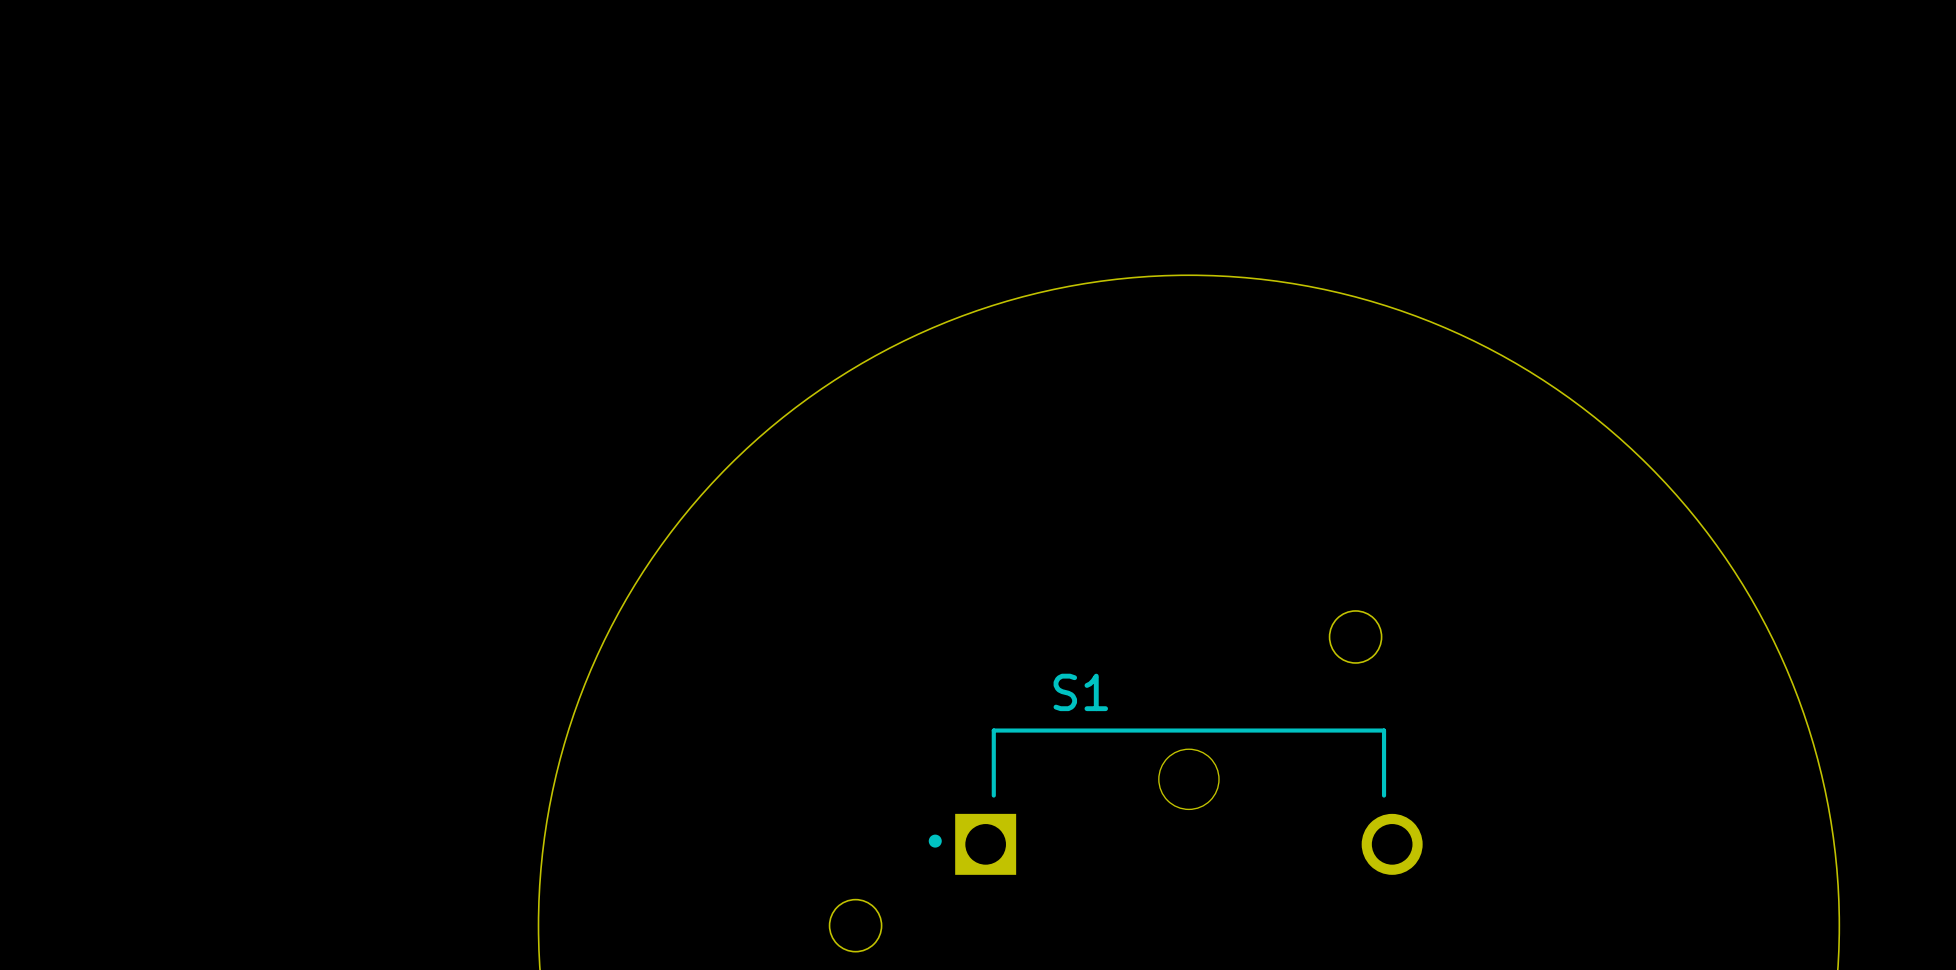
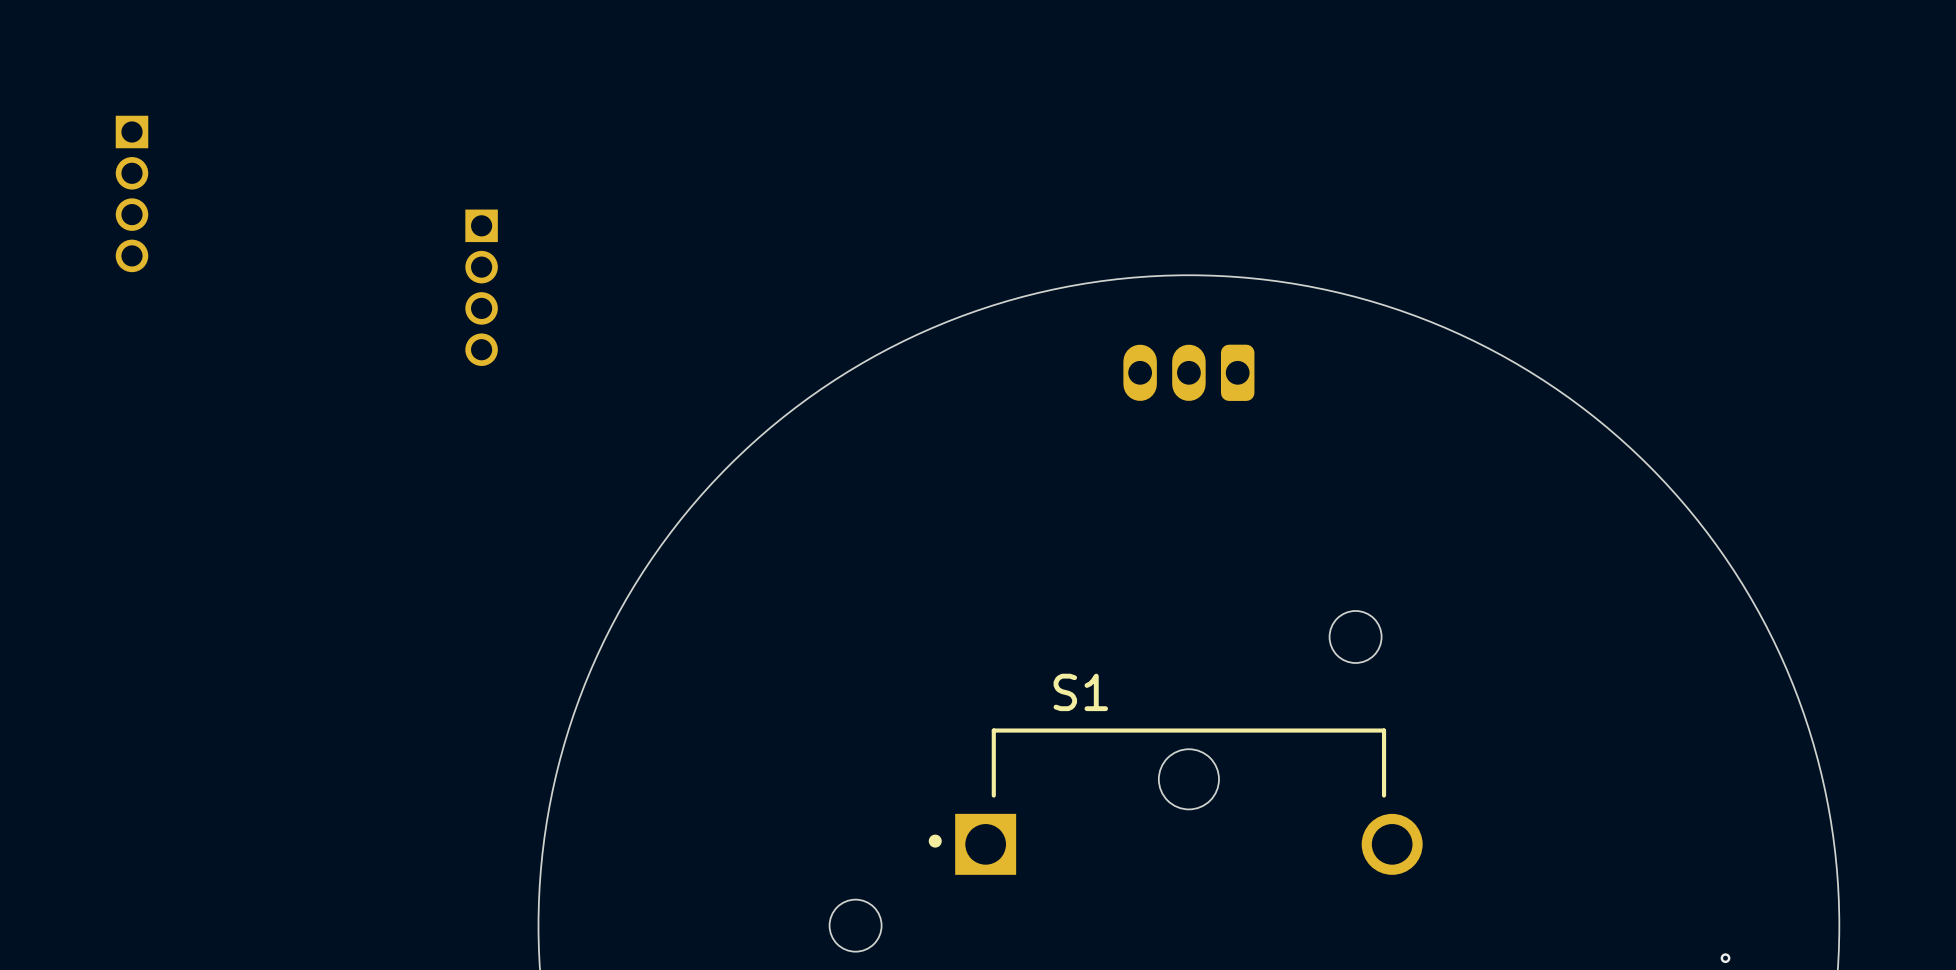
part: none -> (131, 193)
part: none -> (481, 287)
part: none -> (1188, 372)
via: none -> (1725, 958)

